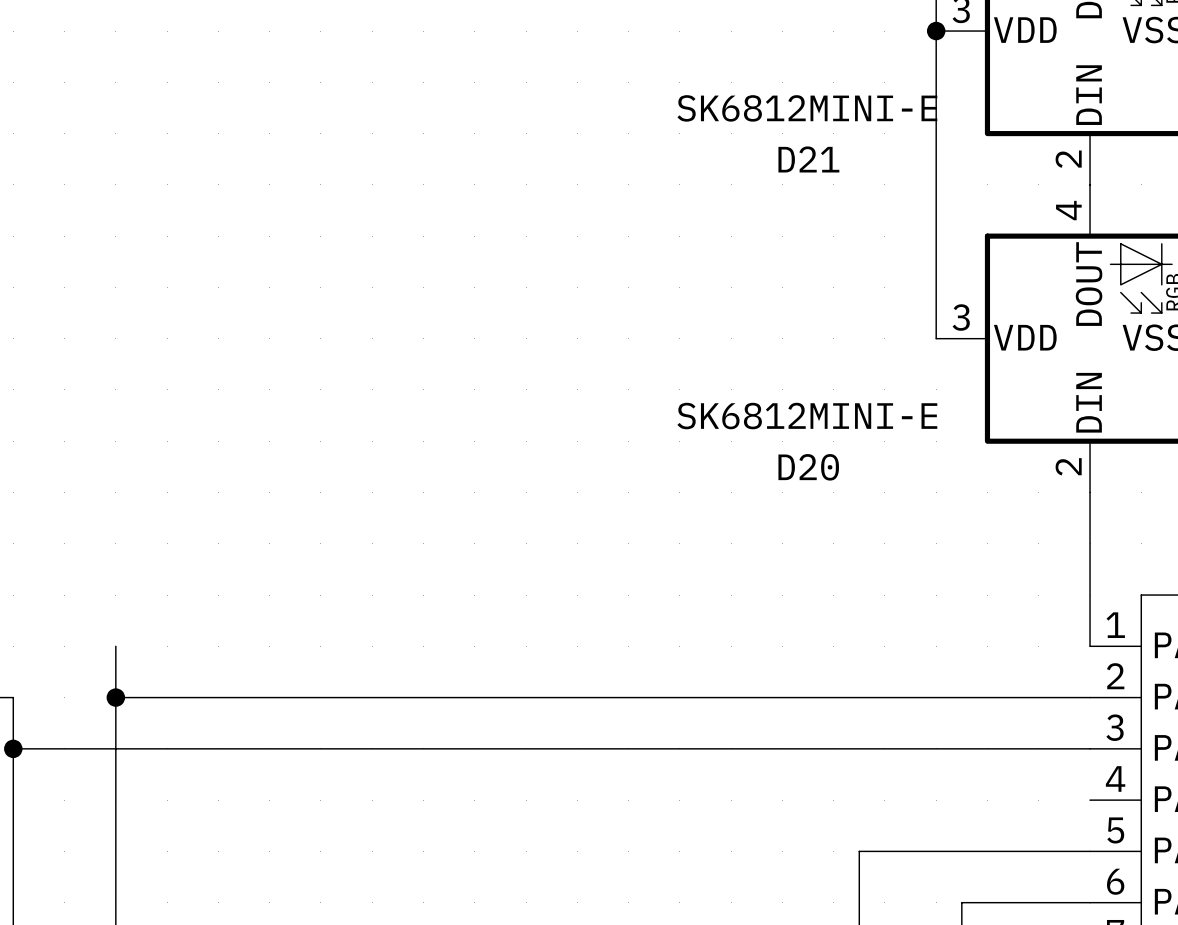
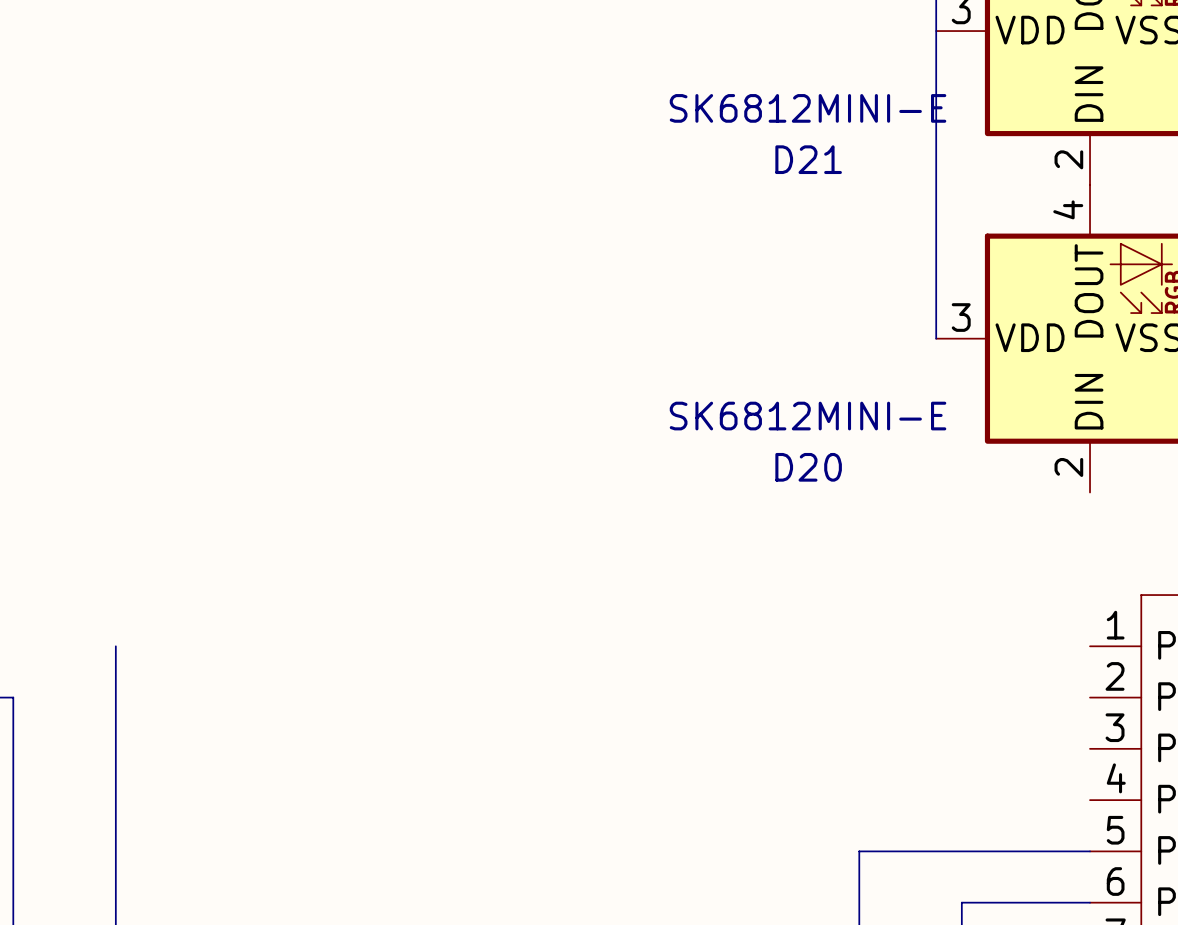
junction: (936, 31) -> none
wire: (1090, 492) (1090, 646) -> none
wire: (115, 697) (1090, 697) -> none
junction: (115, 697) -> none
wire: (13, 748) (1090, 748) -> none
junction: (13, 748) -> none

